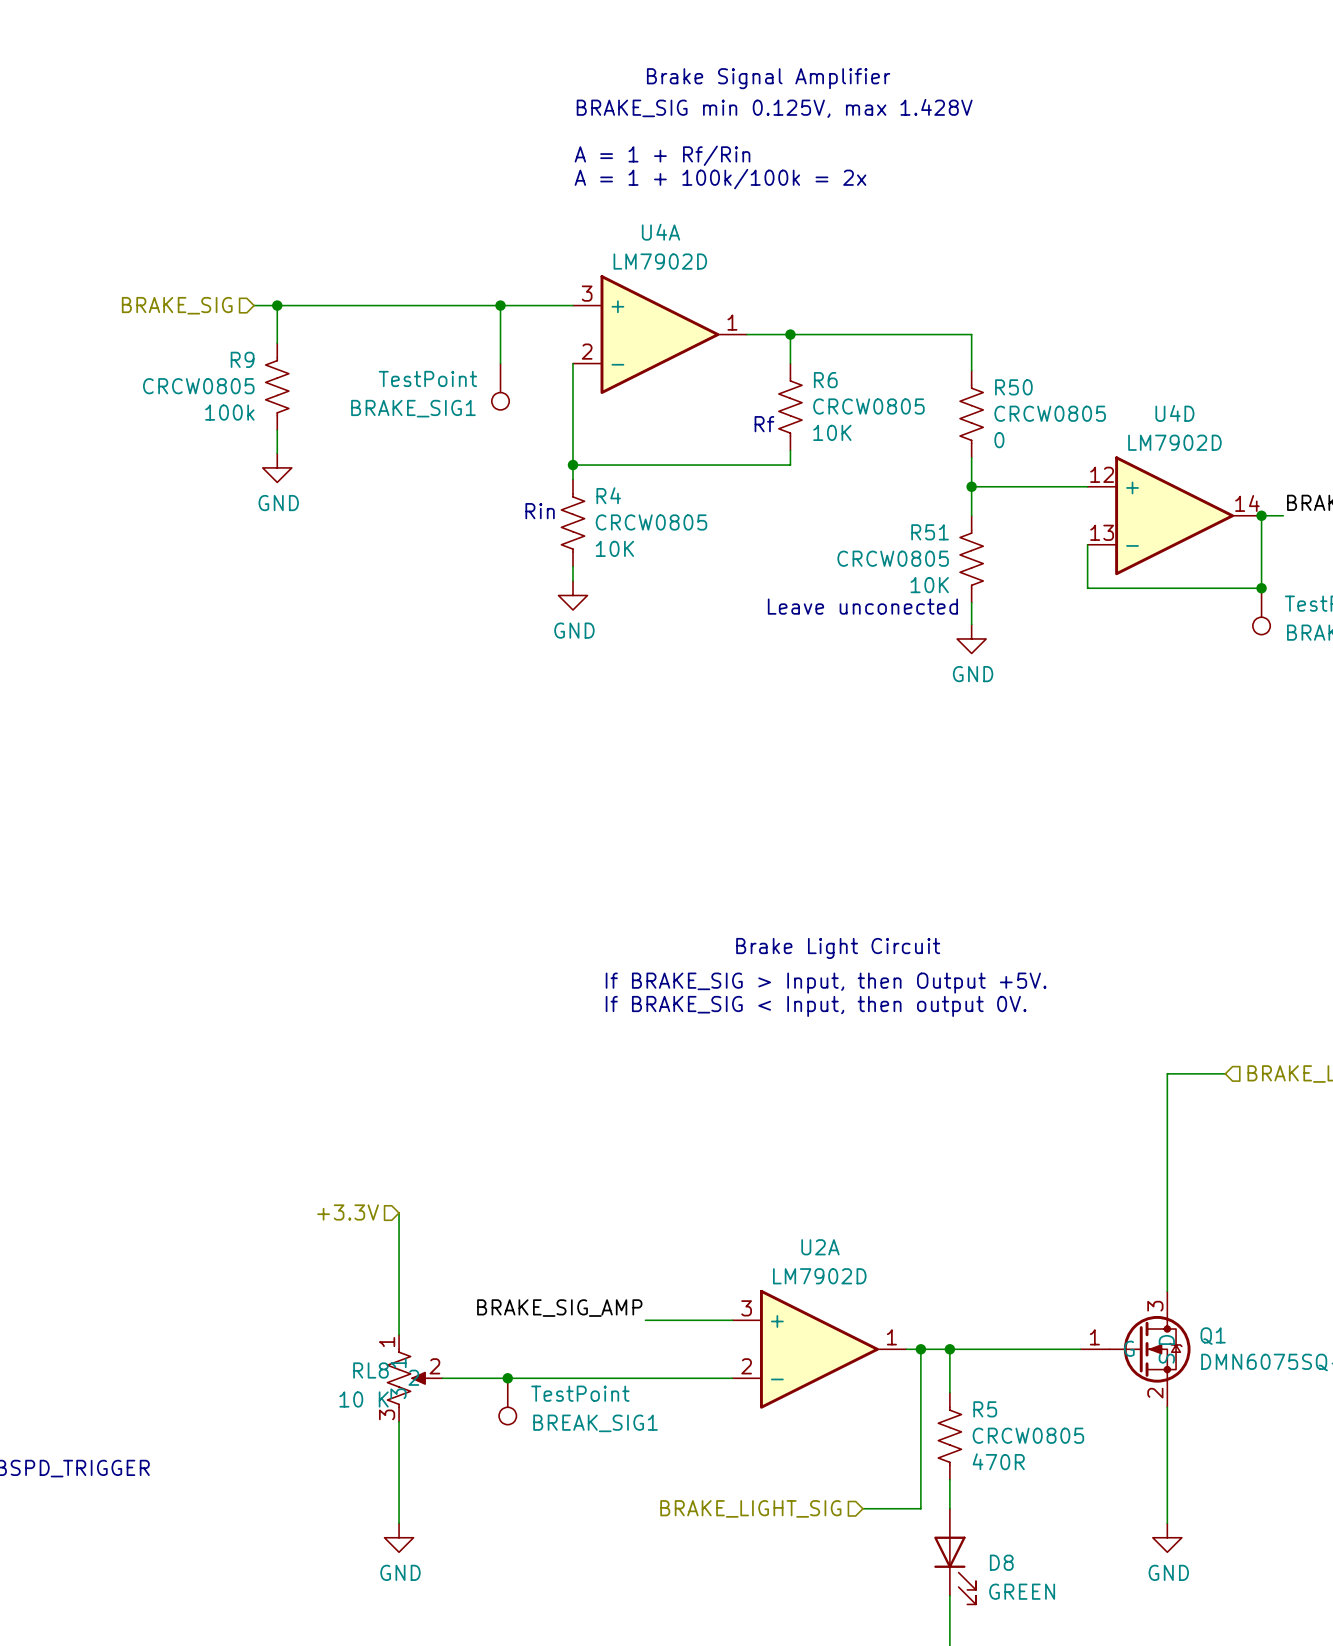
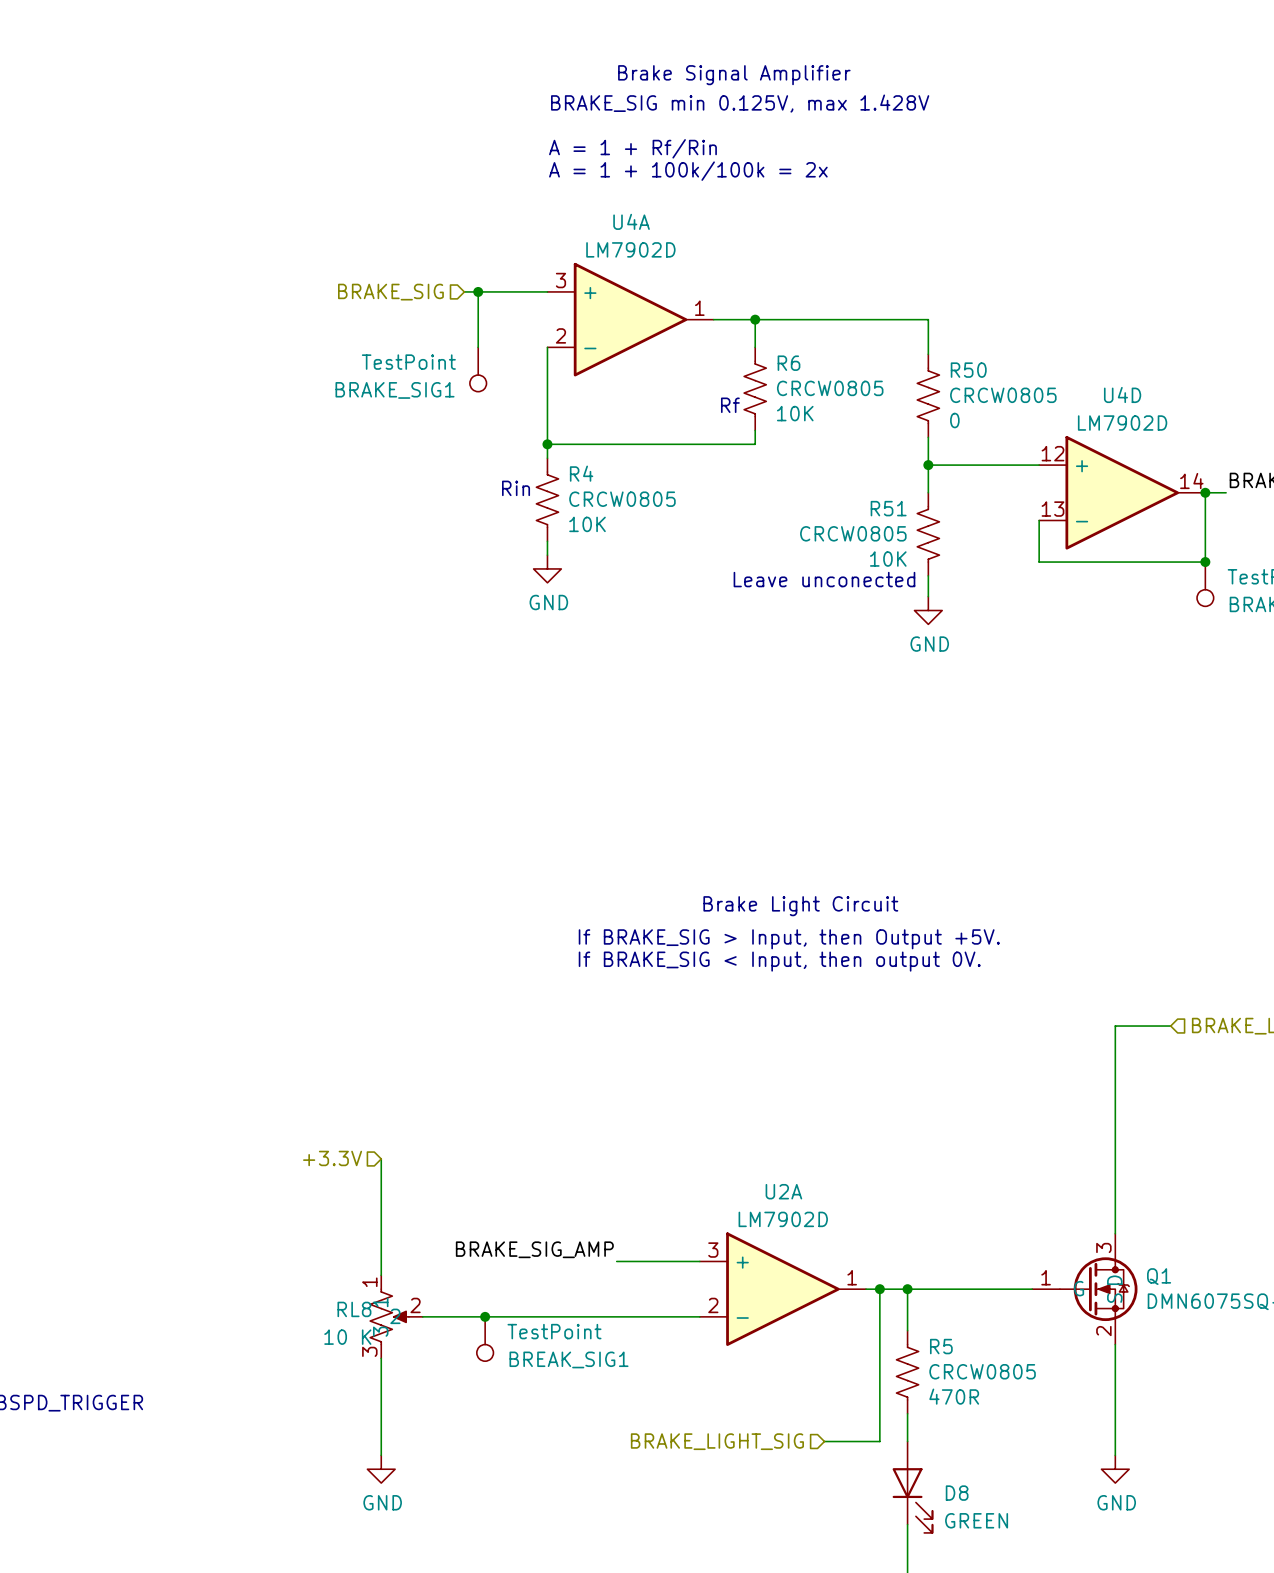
hierarchical label position: BRAKE_SIG (177, 305) -> BRAKE_SIG (390, 292)
wire: (254, 305) (486, 305) -> none
wire: (277, 305) (277, 343) -> none
junction: (277, 305) -> none
R9: CRCW0805 (277, 386) -> none
wire: (277, 430) (277, 453) -> none
power symbol: GND (277, 467) -> none

